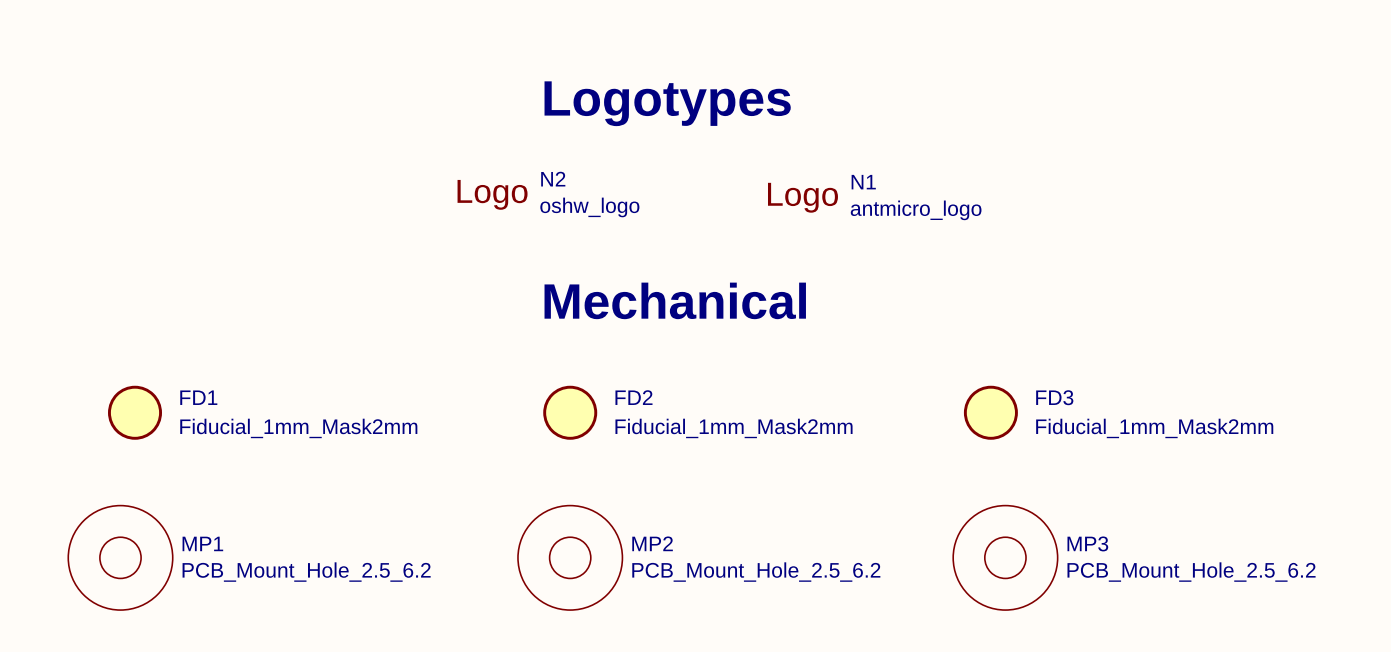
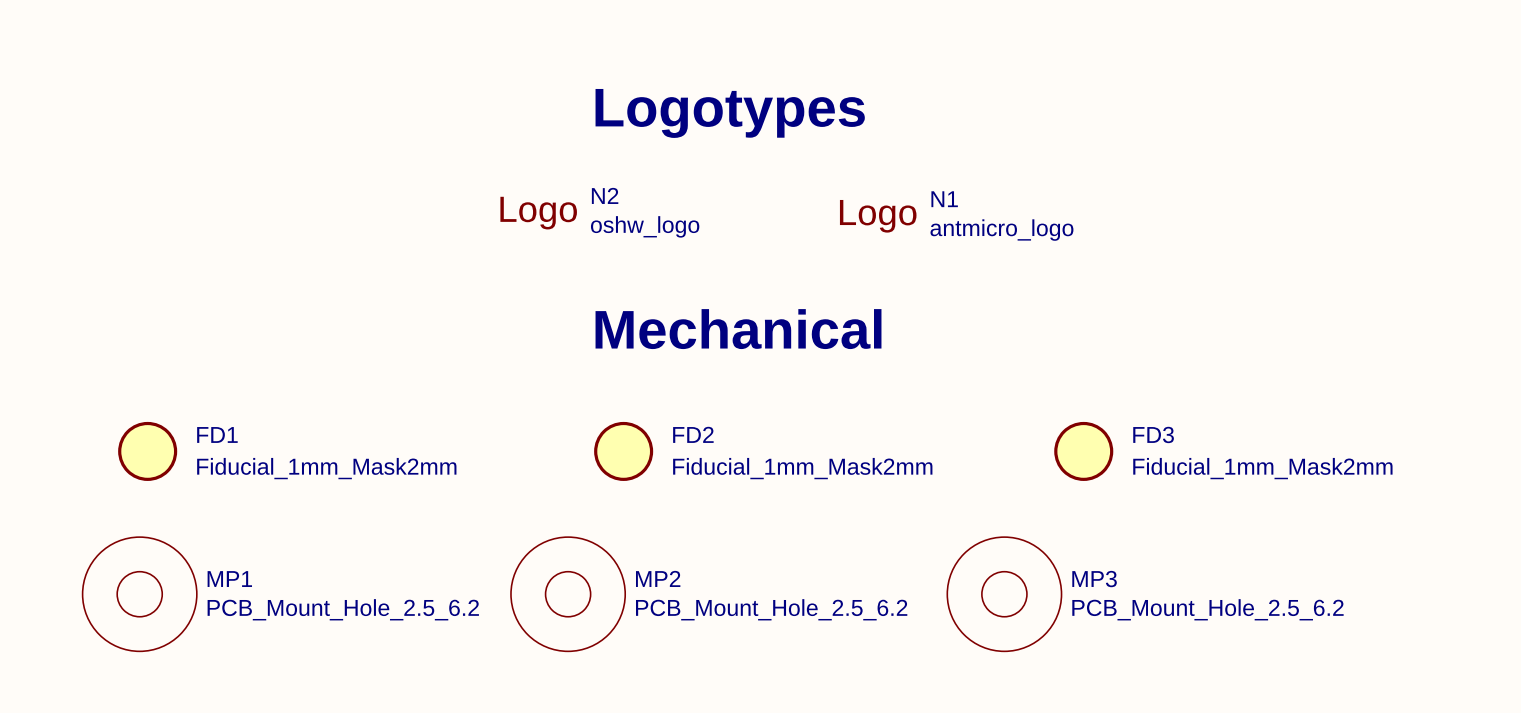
MP1 position: (120, 557) -> (139, 594)
MP2 position: (570, 557) -> (568, 594)
MP3 position: (1005, 557) -> (1004, 594)

